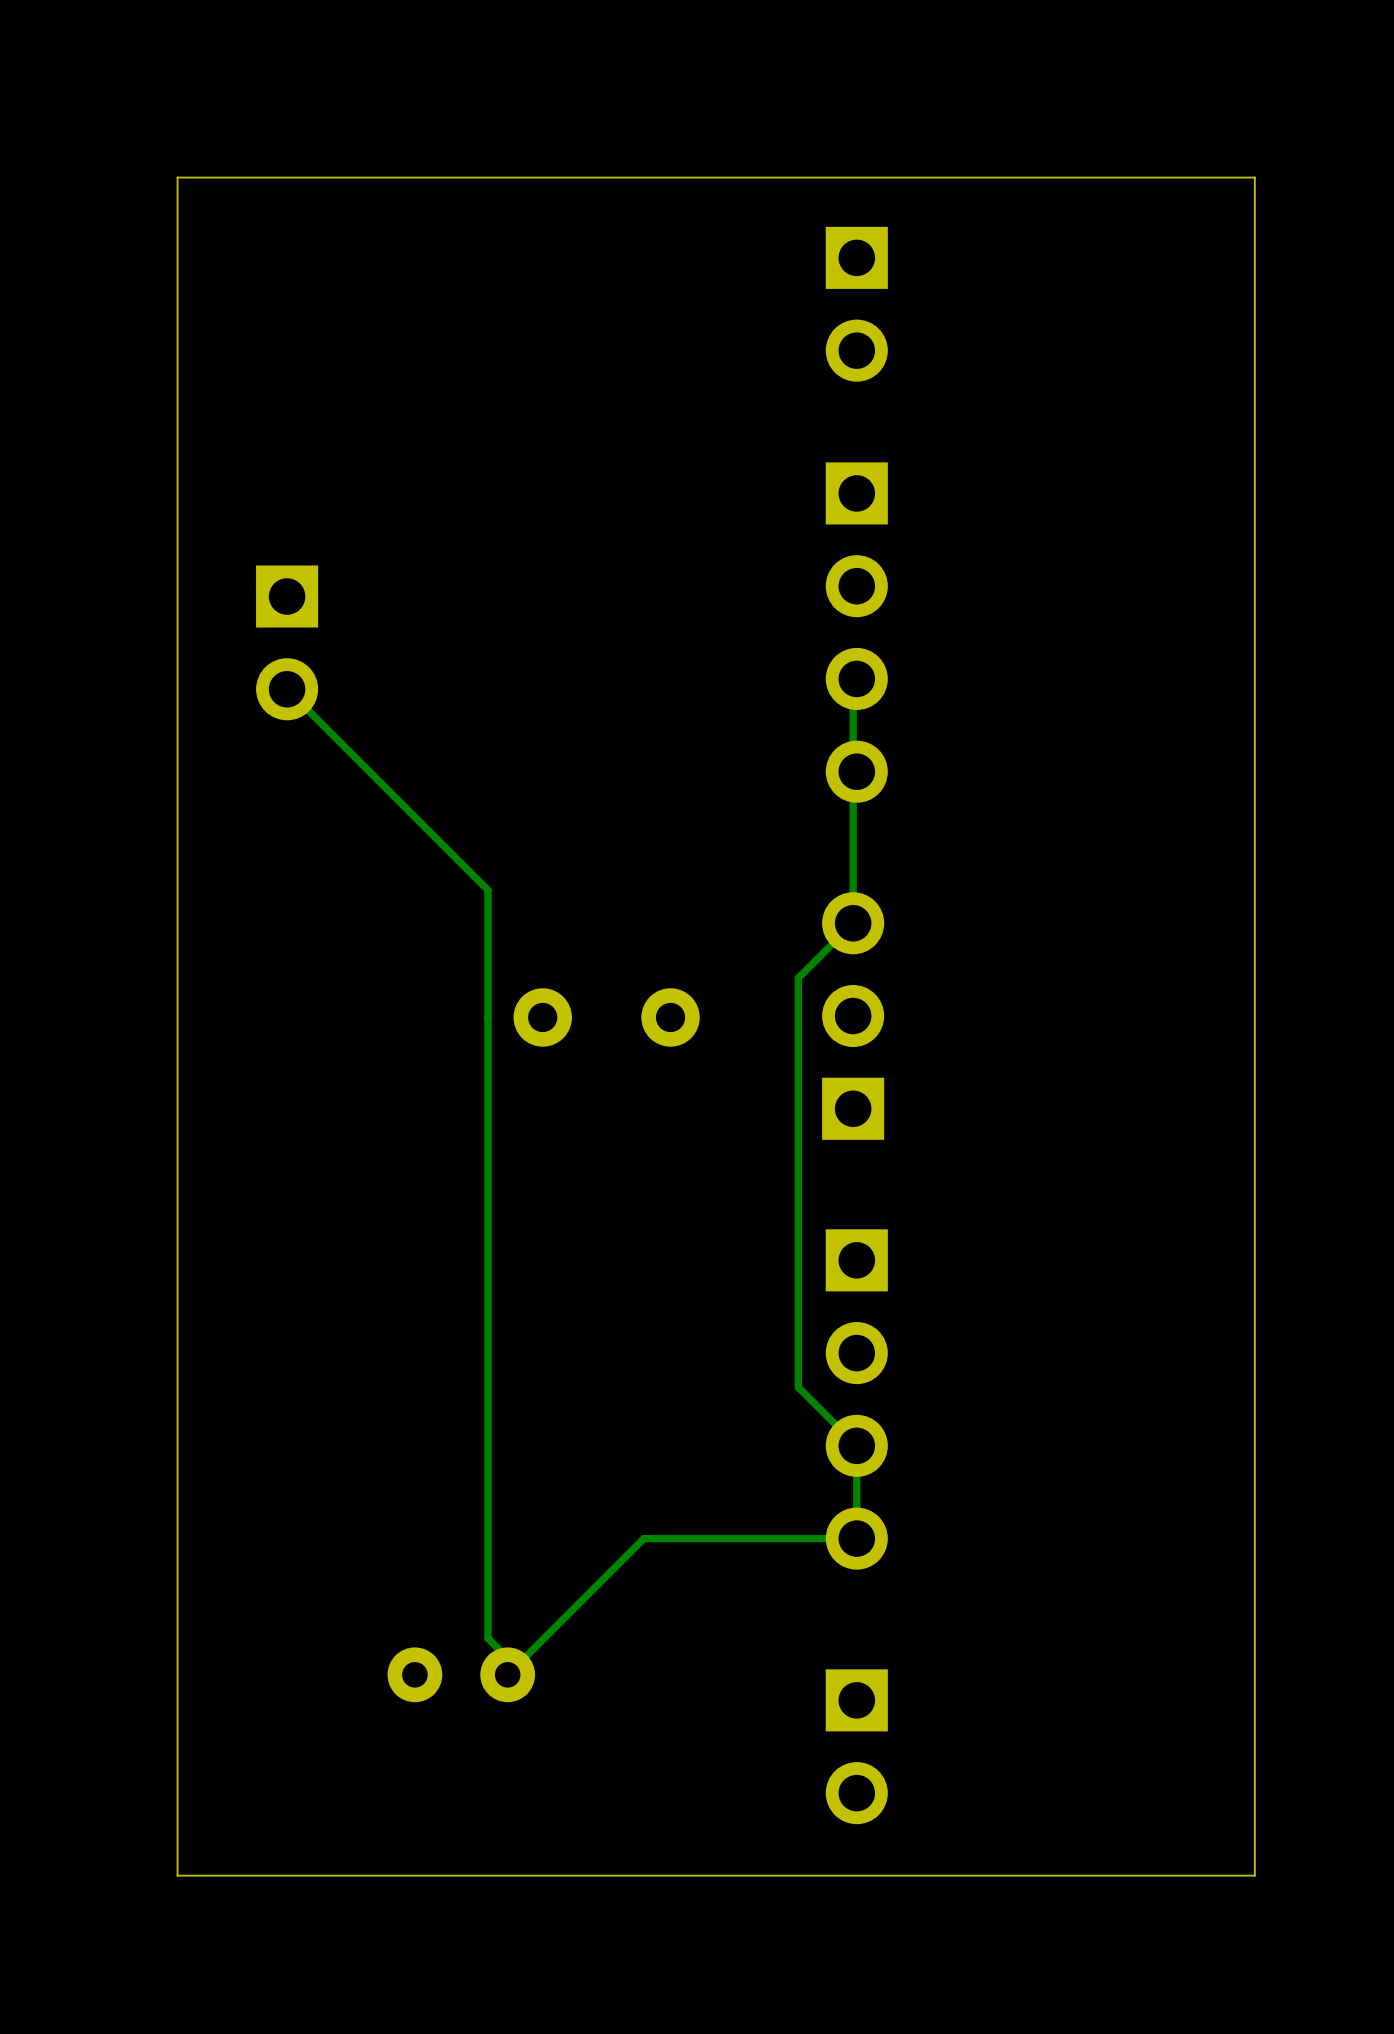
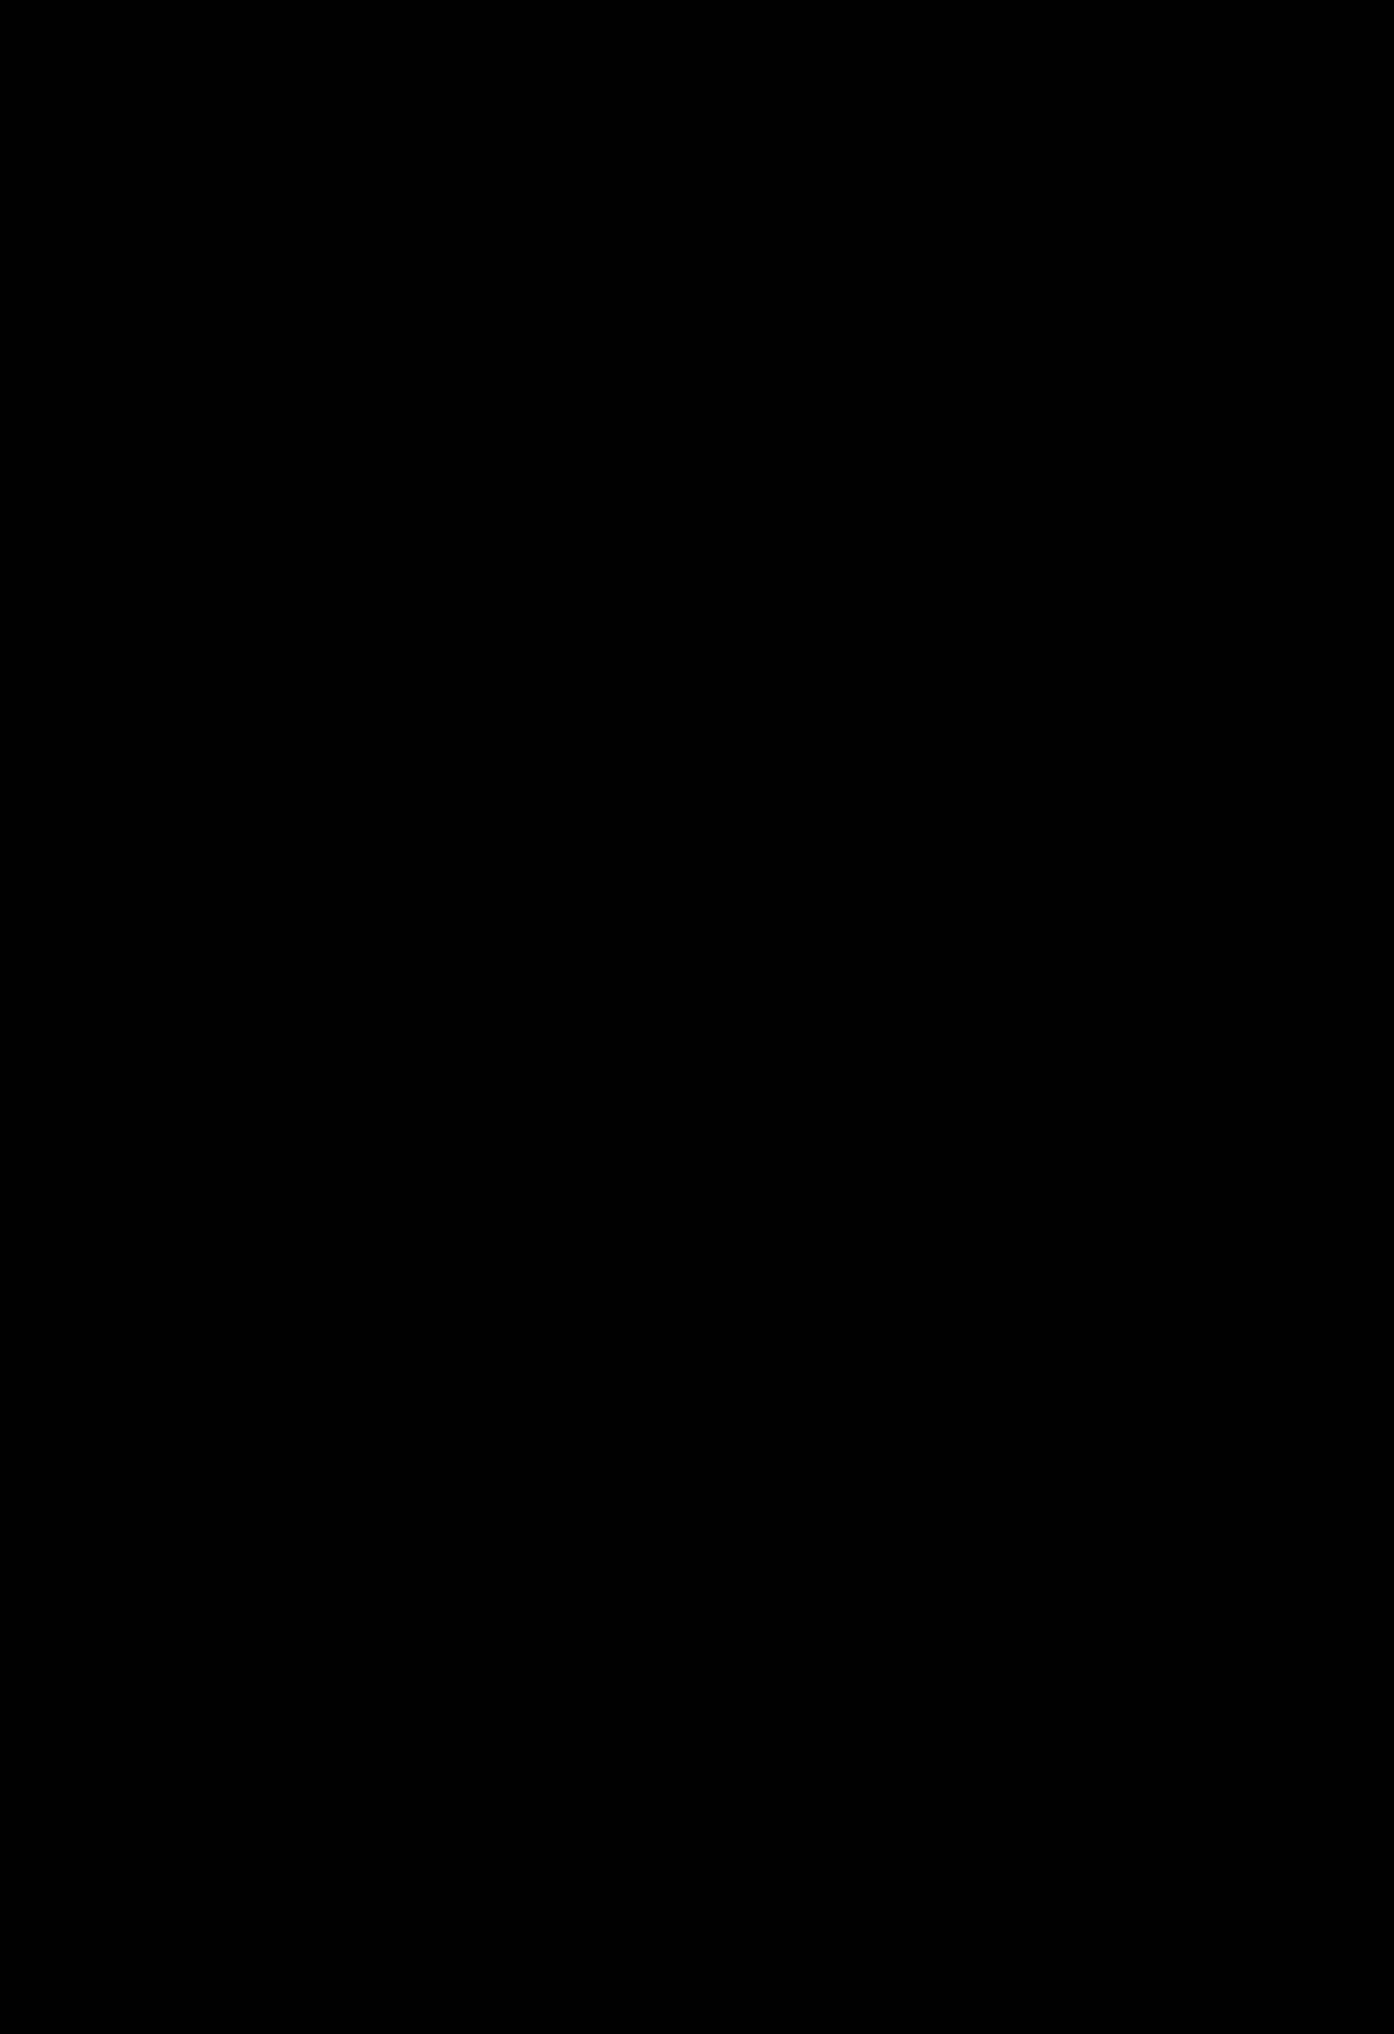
board edge: (1254, 177) (177, 177) (177, 1875) (1254, 1875) (1254, 177) -> none
part: (856, 304) -> none
part: (856, 632) -> none
part: (287, 642) -> none
track: (856, 678) (853, 682) (853, 923) (798, 978) (798, 1387) (856, 1445) (856, 1538) (643, 1538) (507, 1674) (507, 1658) (487, 1638) (487, 890) (287, 689) -> none
part: (853, 1016) -> none
part: (606, 1017) -> none
part: (856, 1399) -> none
part: (414, 1674) -> none
part: (507, 1674) -> none
part: (856, 1746) -> none

